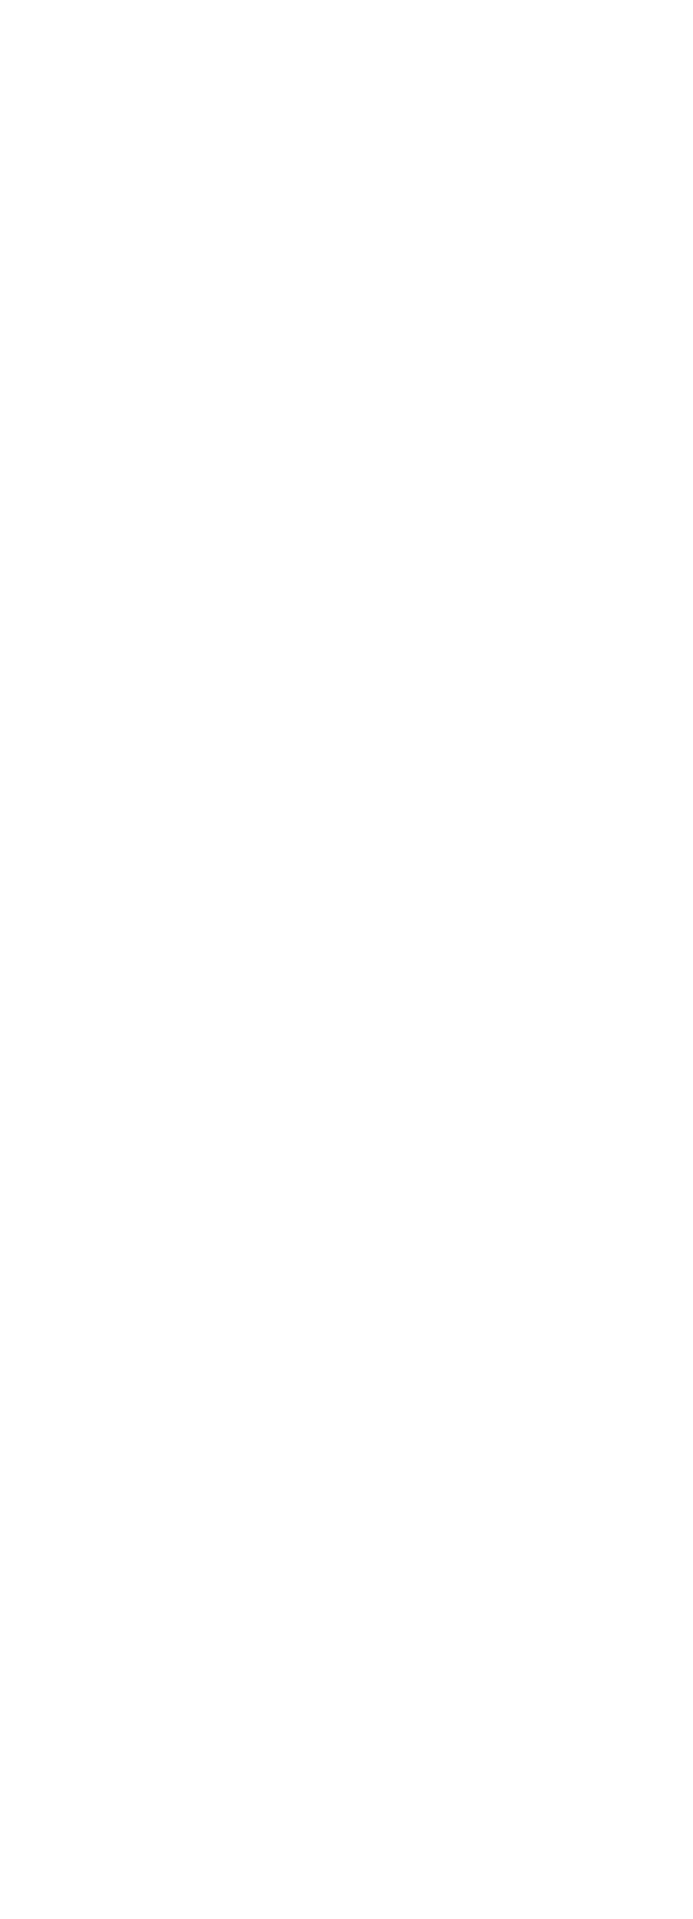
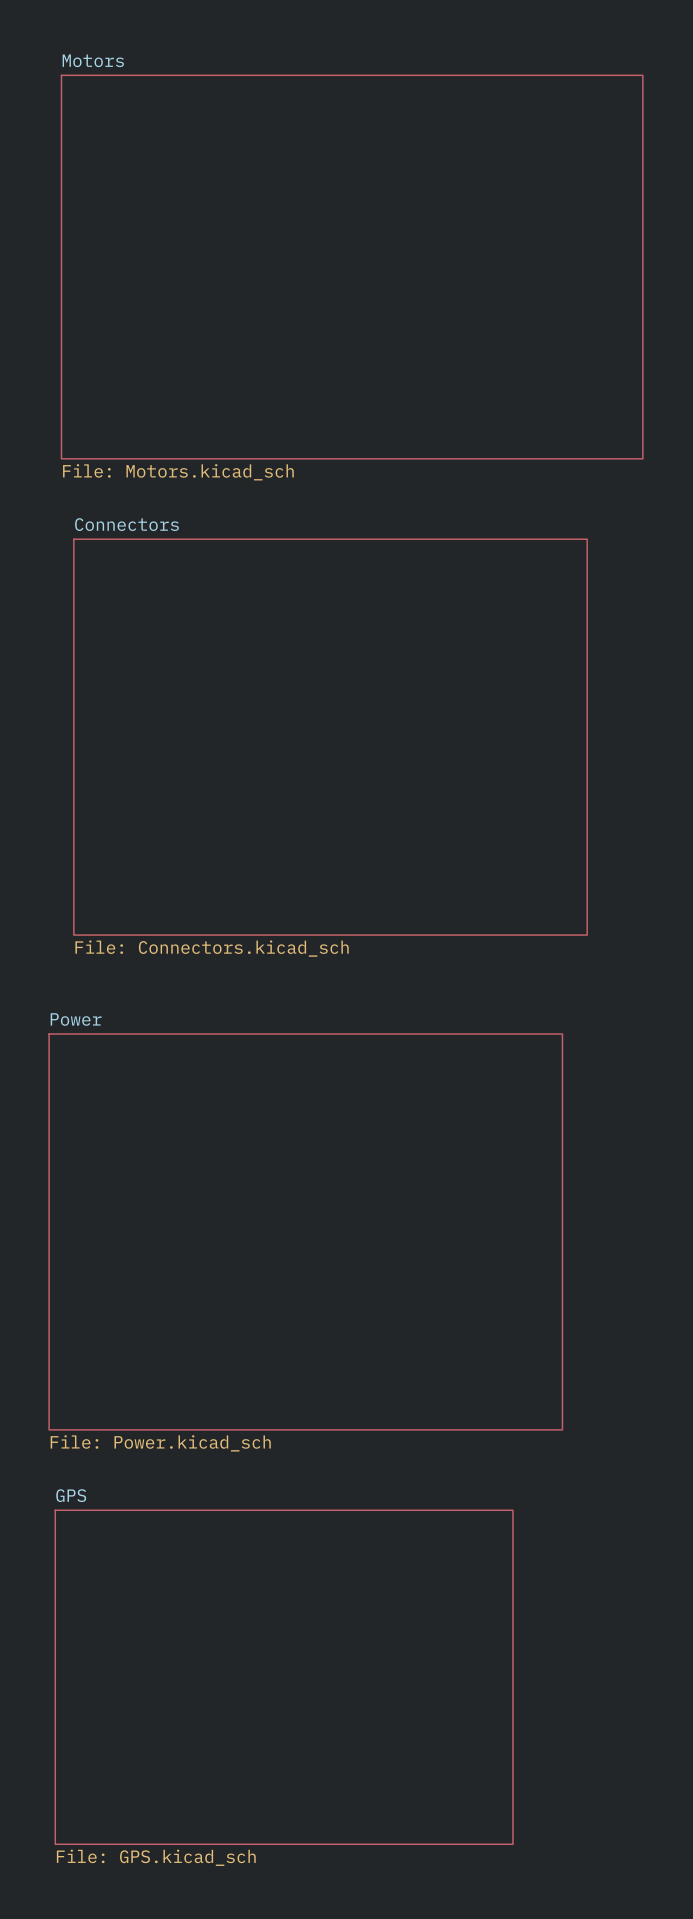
sheet Motors: none -> File: Motors.kicad_sch (352, 267)
sheet Connectors: none -> File: Connectors.kicad_sch (330, 737)
sheet Power: none -> File: Power.kicad_sch (305, 1231)
sheet GPS: none -> File: GPS.kicad_sch (284, 1677)

